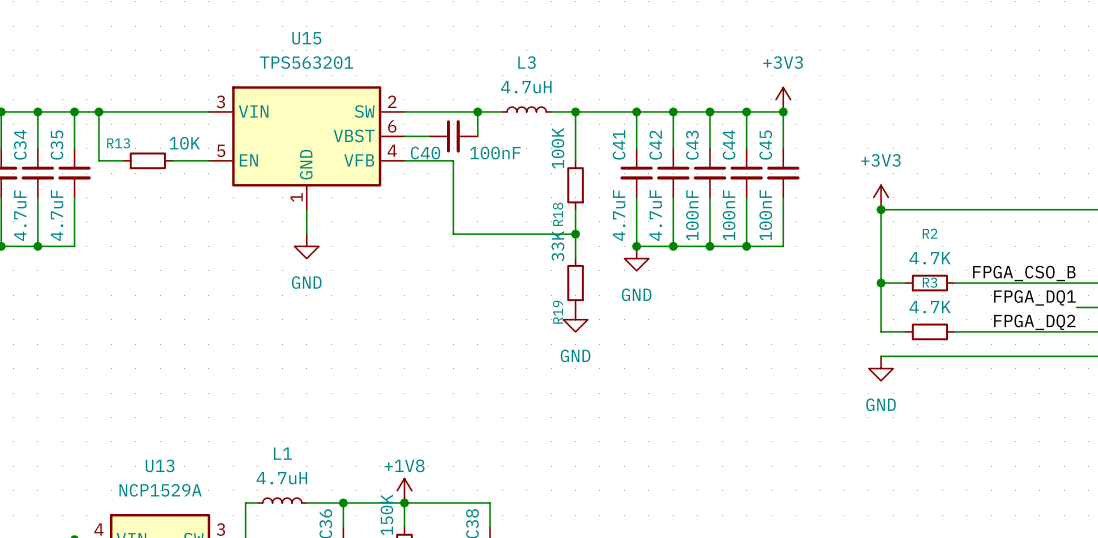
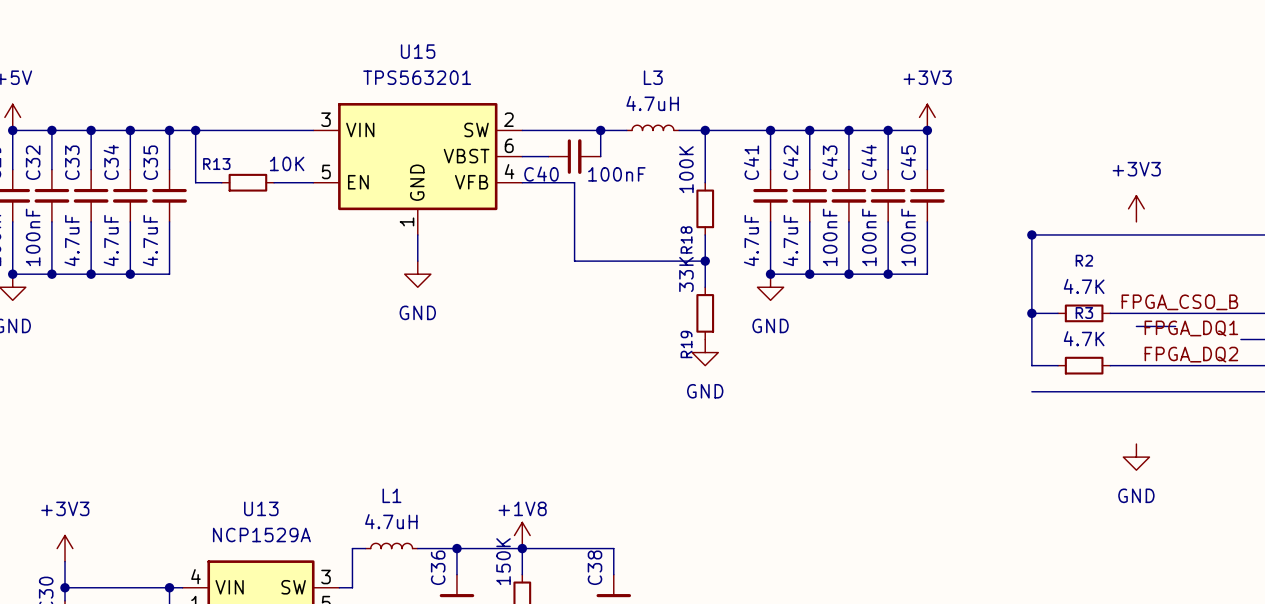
power symbol position: +3V3 (881, 197) -> +3V3 (1136, 208)
wire: none -> (1136, 326) (1175, 326)
power symbol position: GND (881, 368) -> GND (1136, 457)

